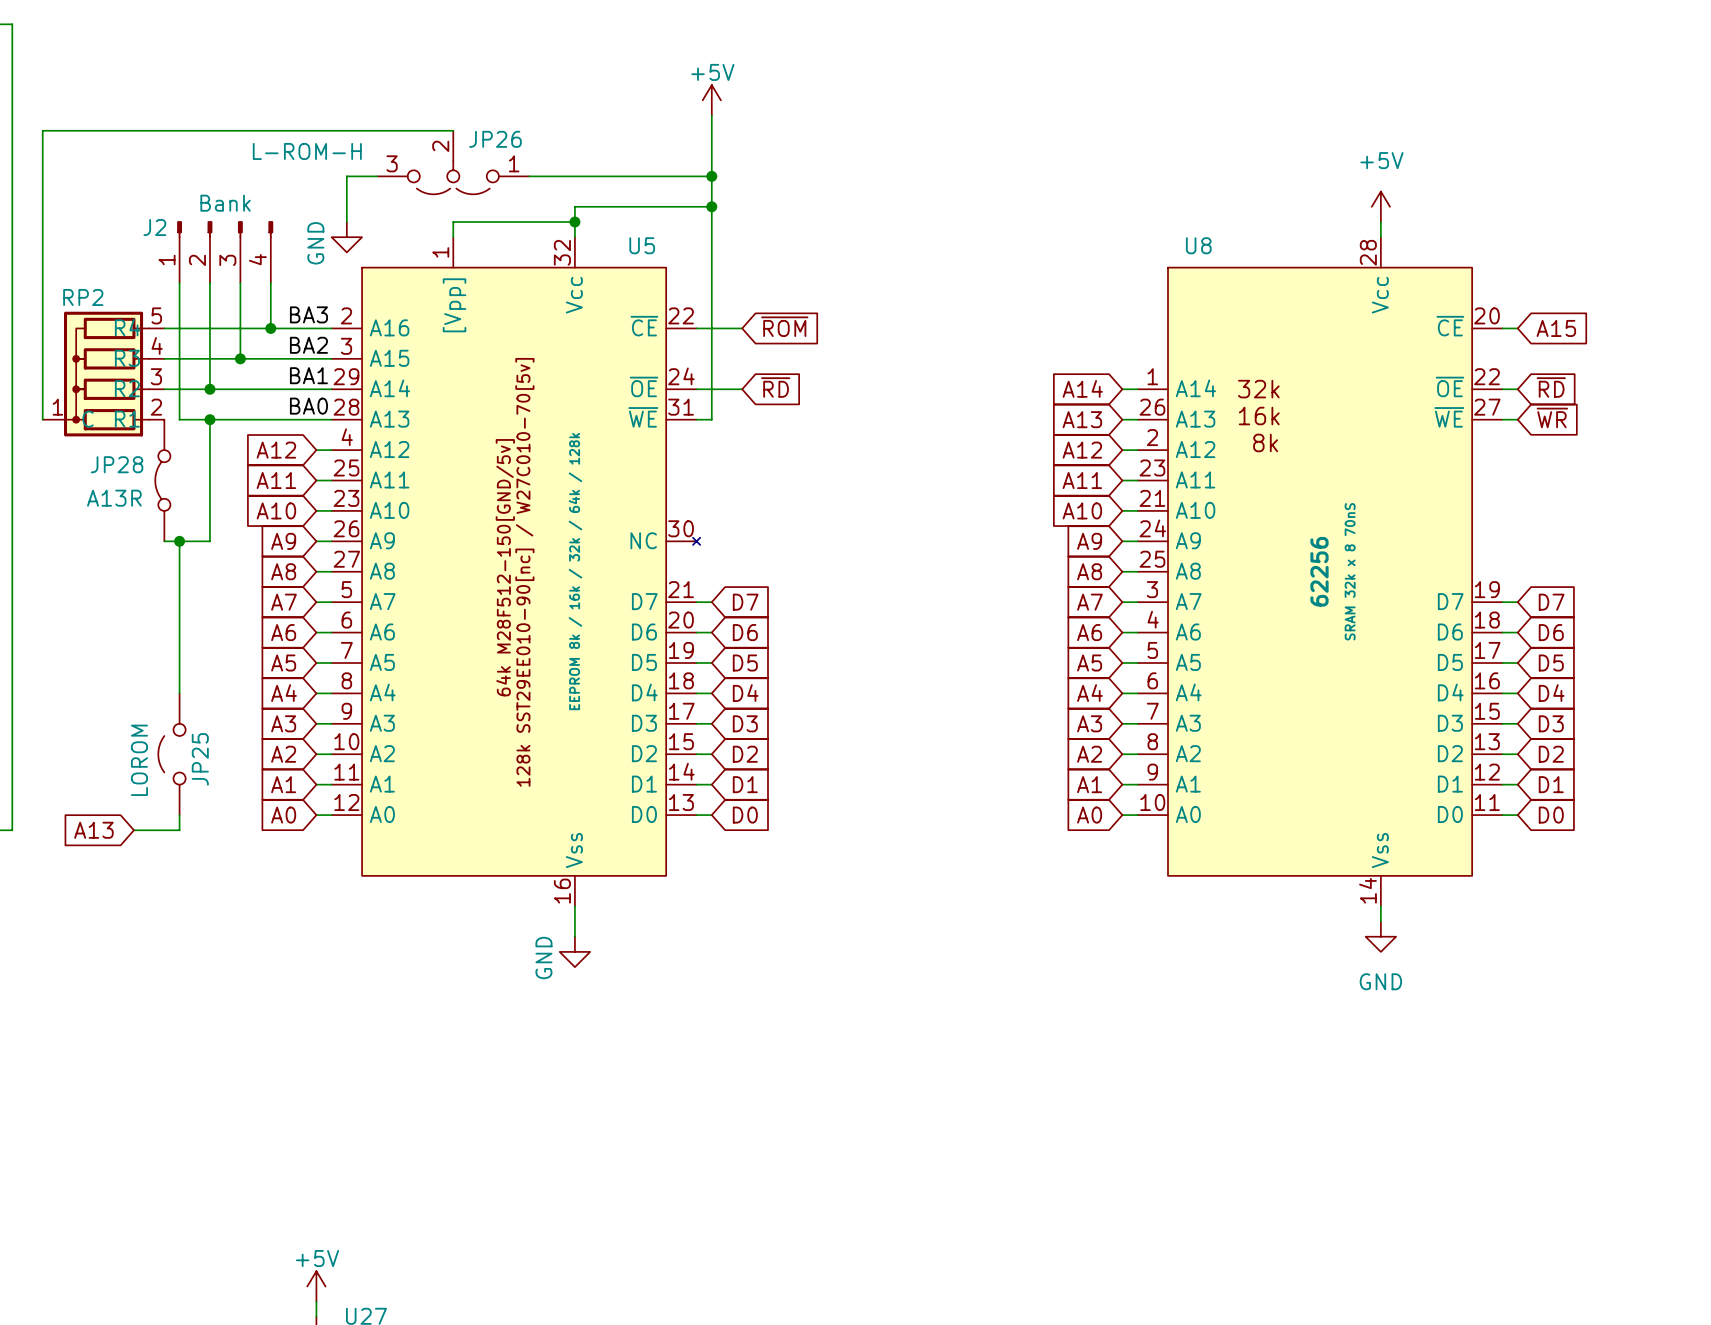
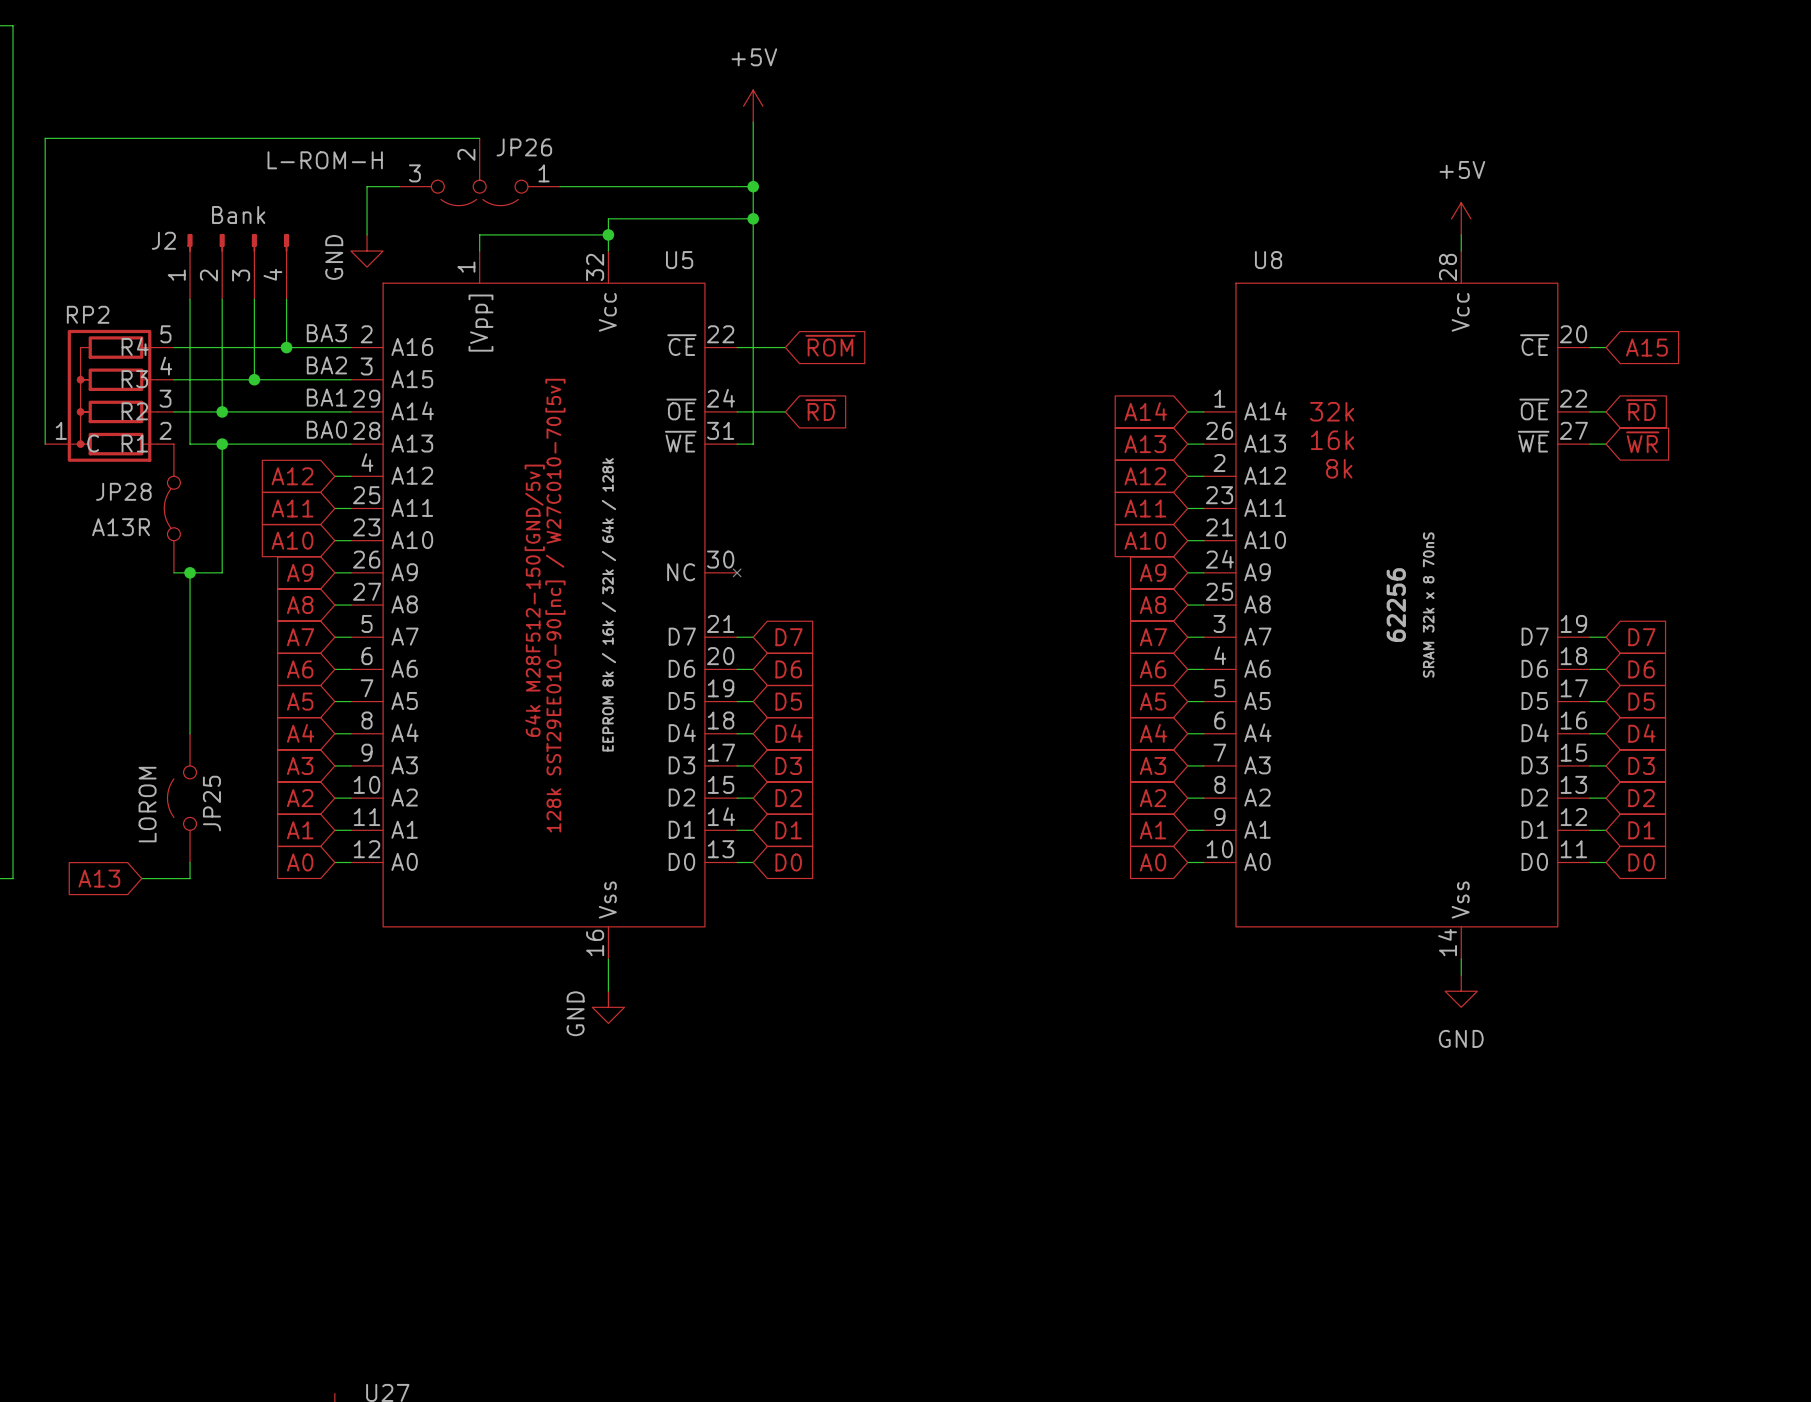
power symbol text position: +5V (712, 72) -> +5V (754, 57)
power symbol: +5V (316, 1286) -> none
wire: (316, 1301) (316, 1316) -> none

